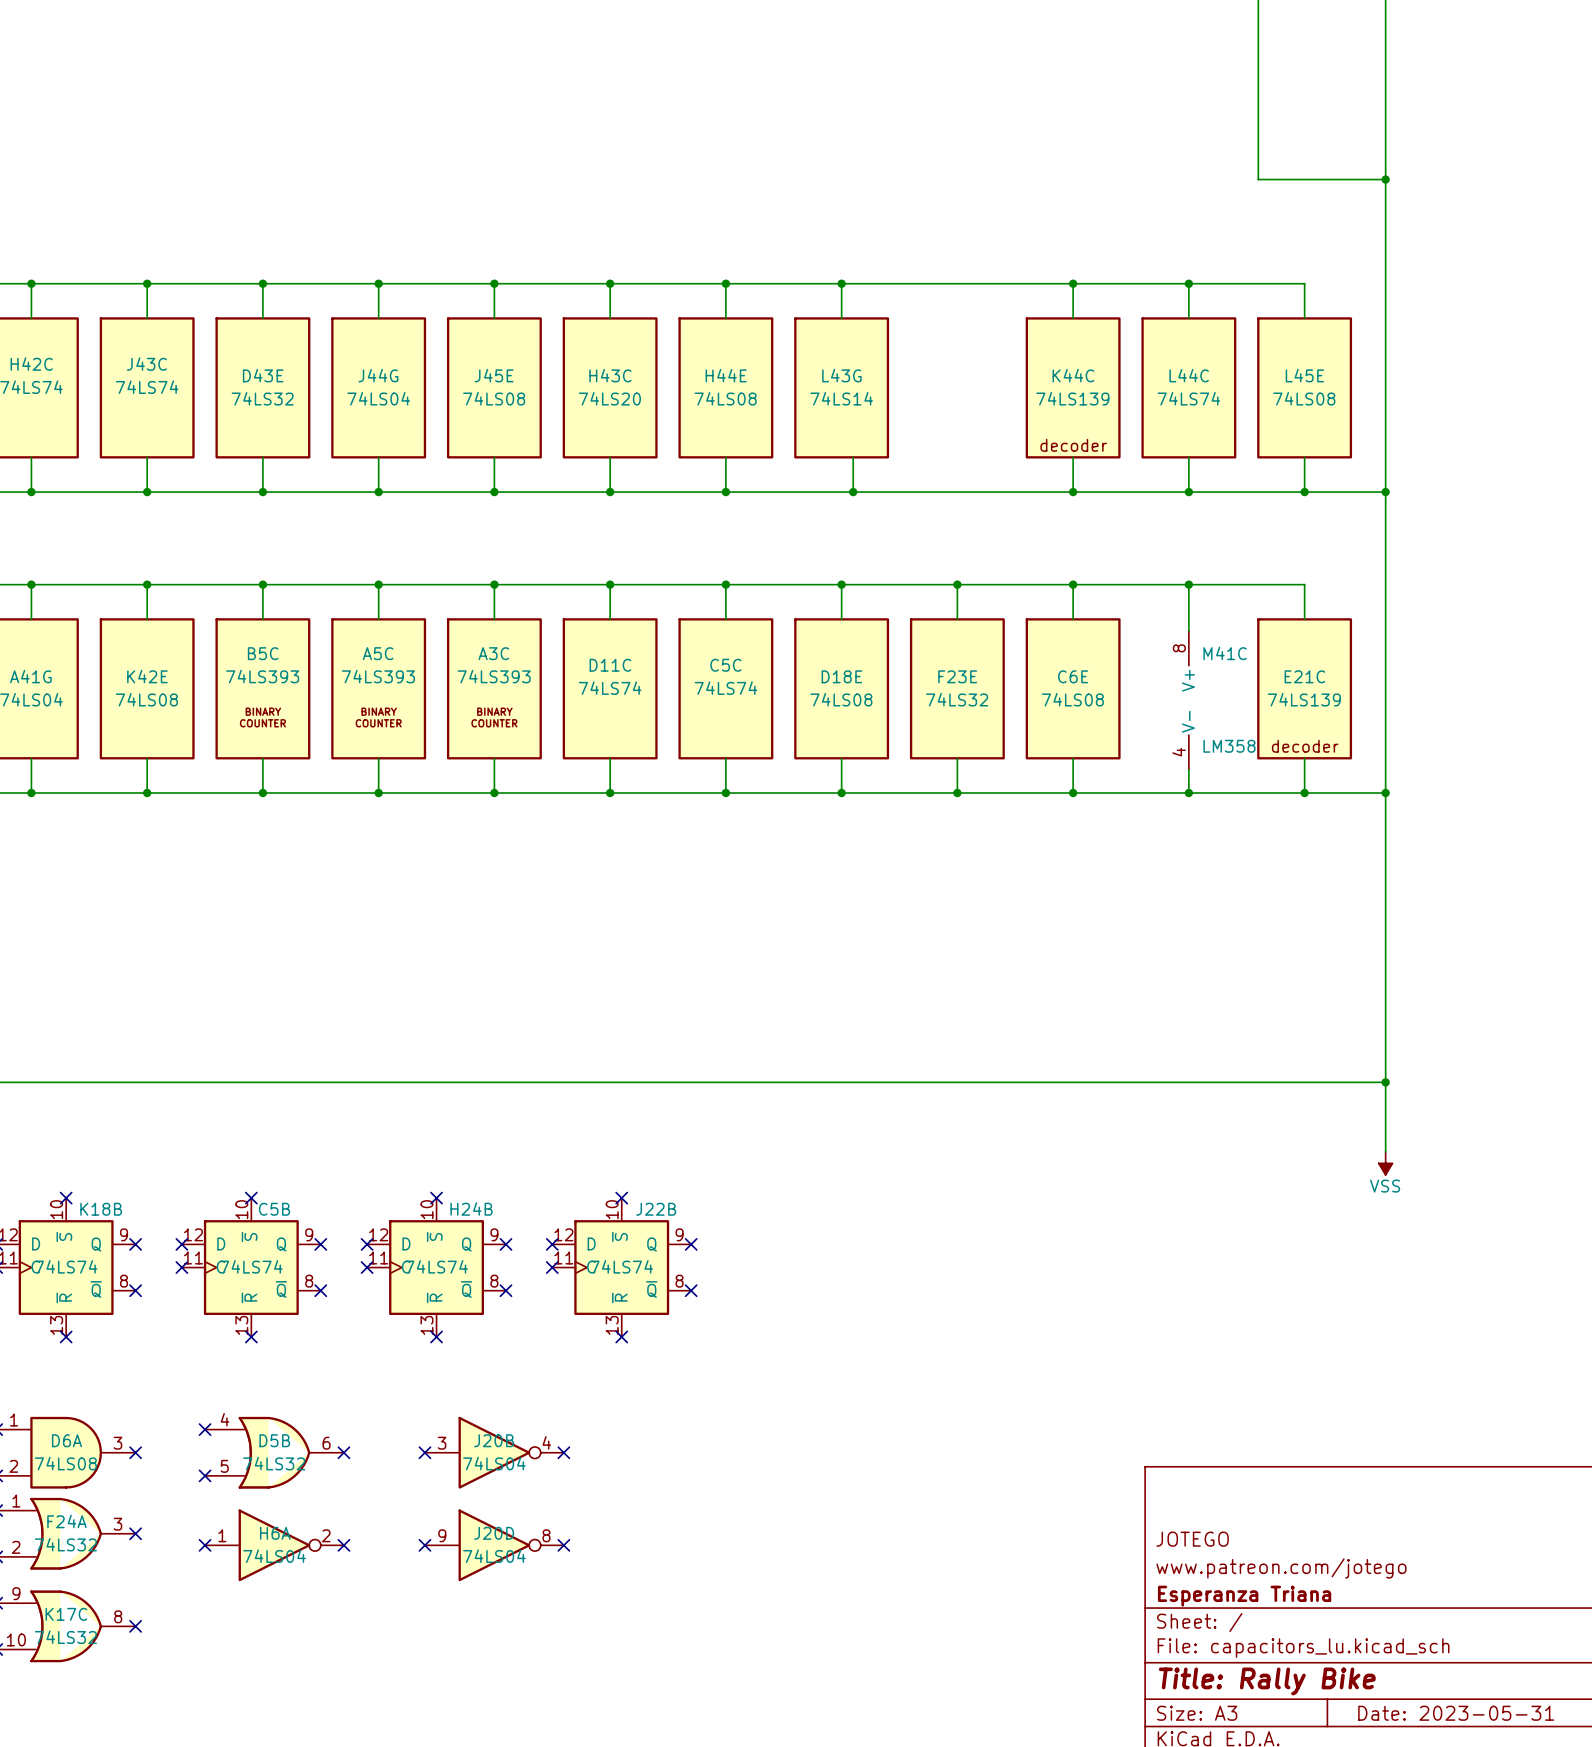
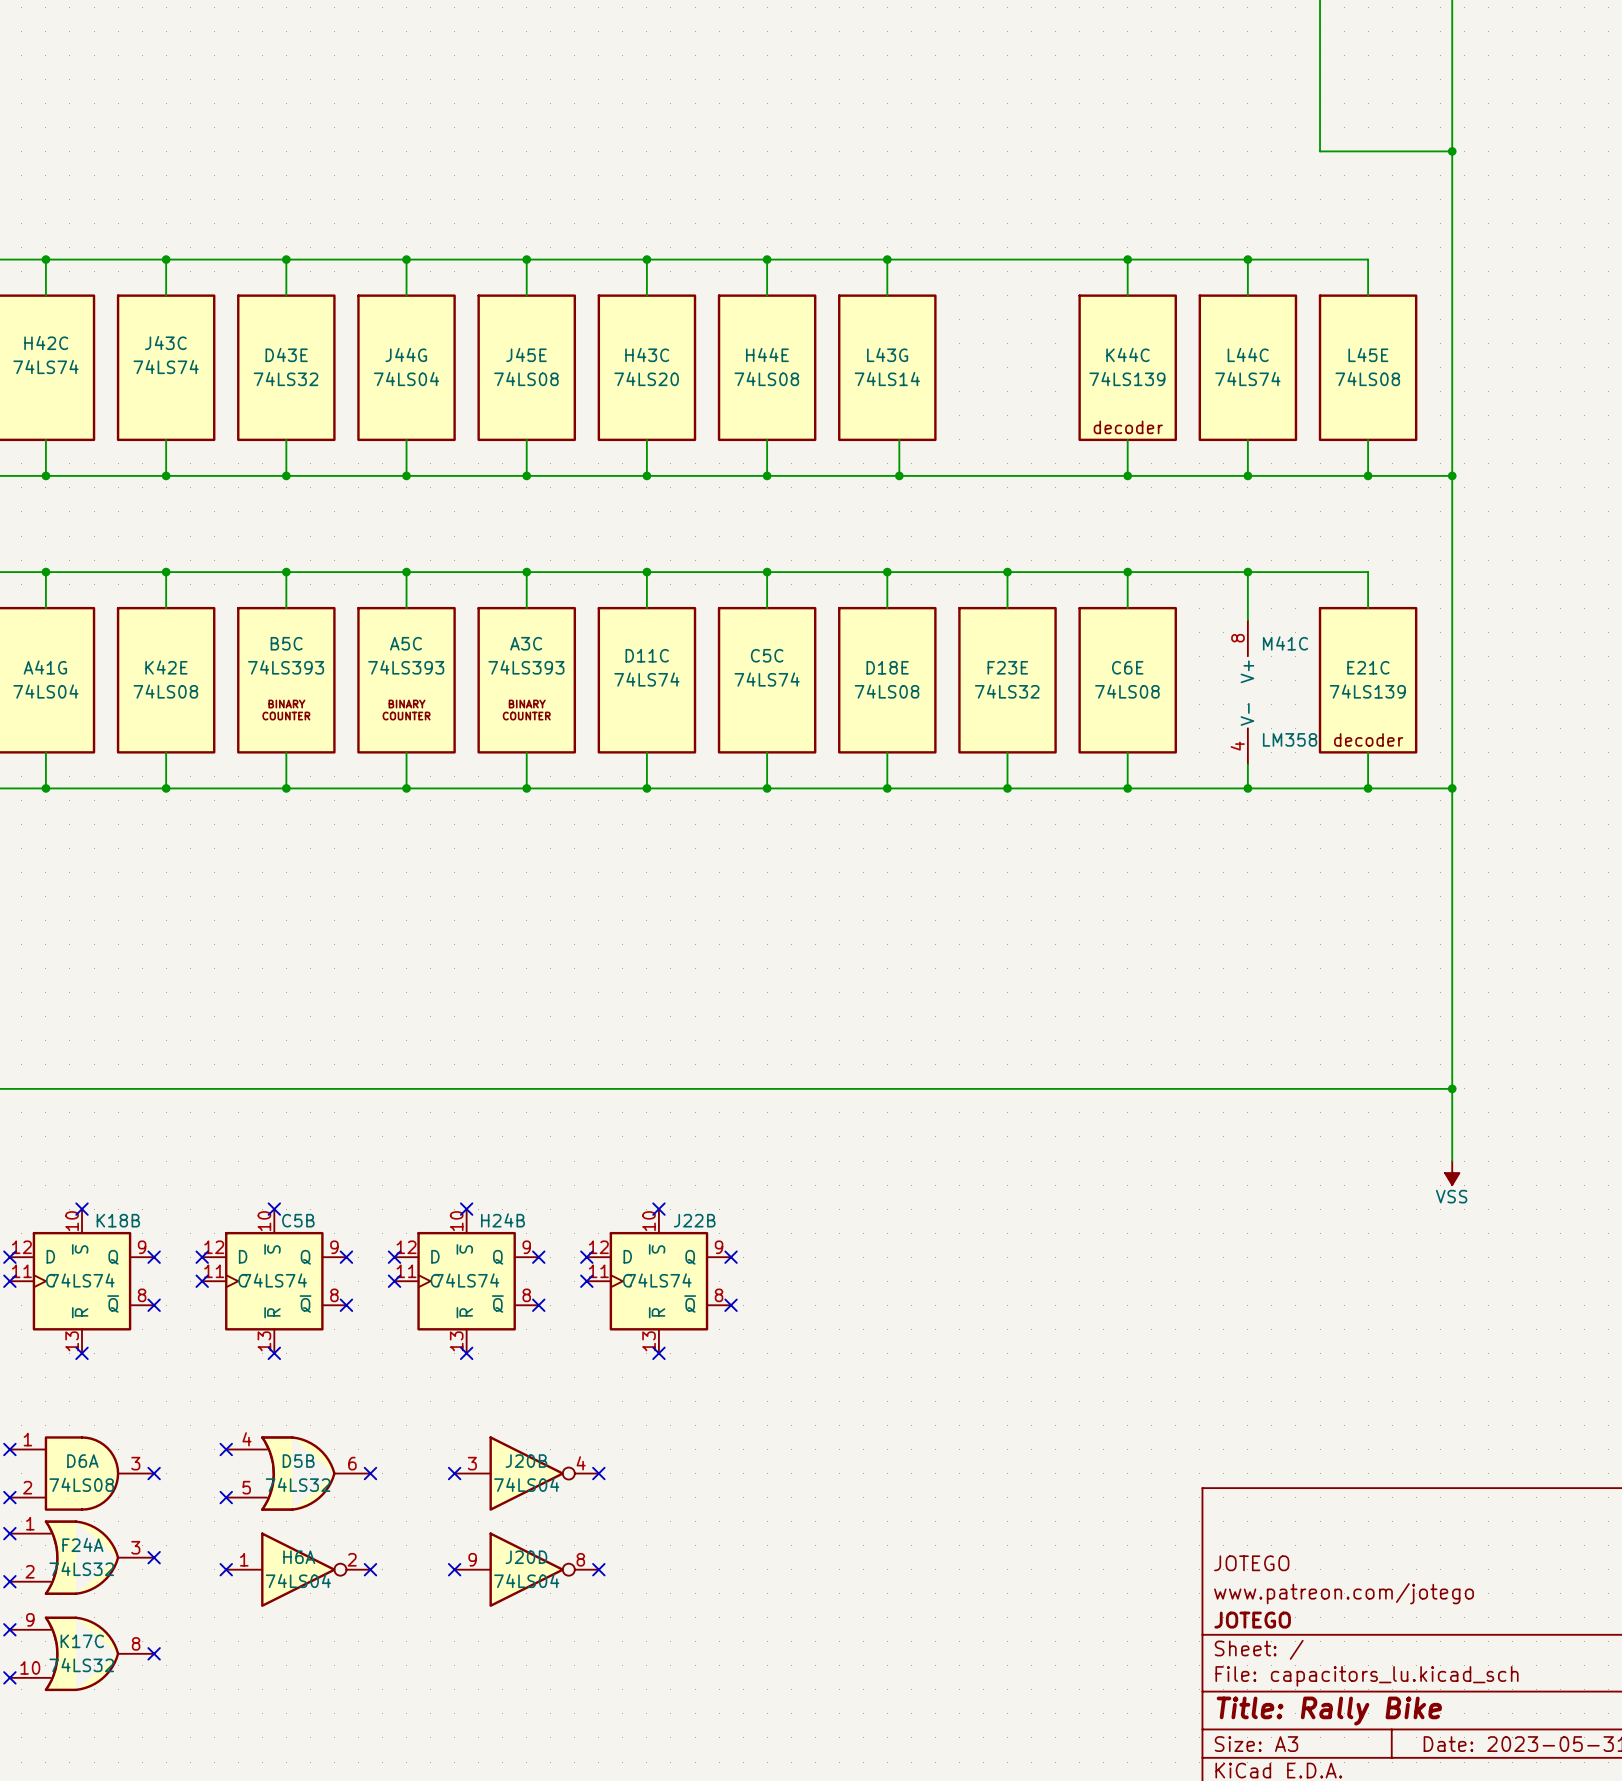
title block: Esperanza Triana (1244, 1596) -> JOTEGO (1252, 1620)

